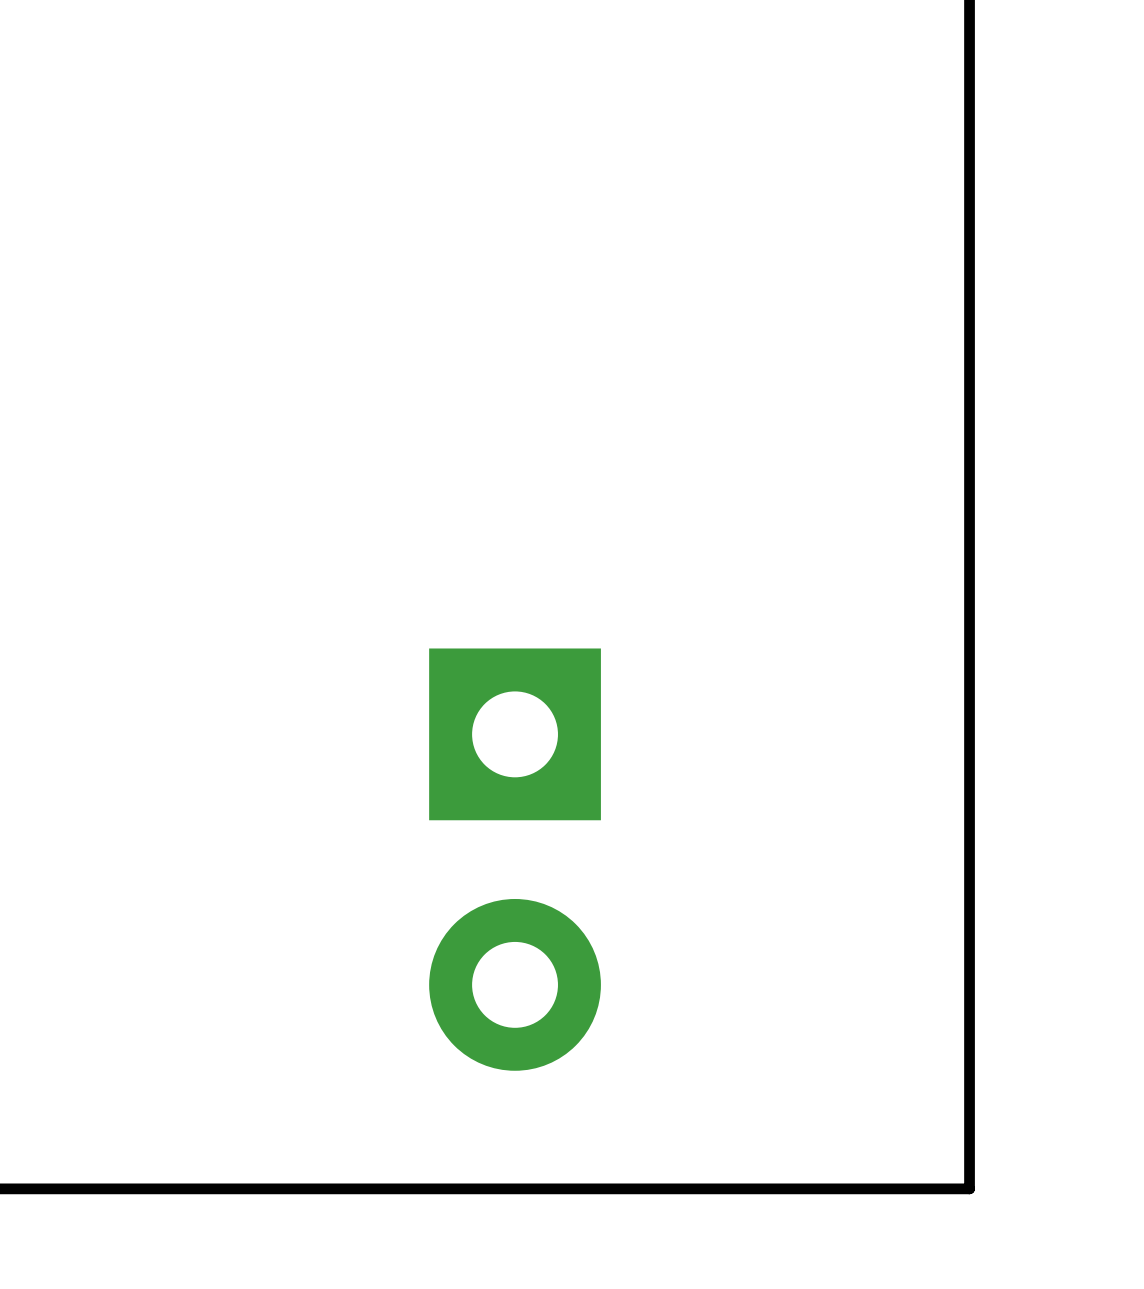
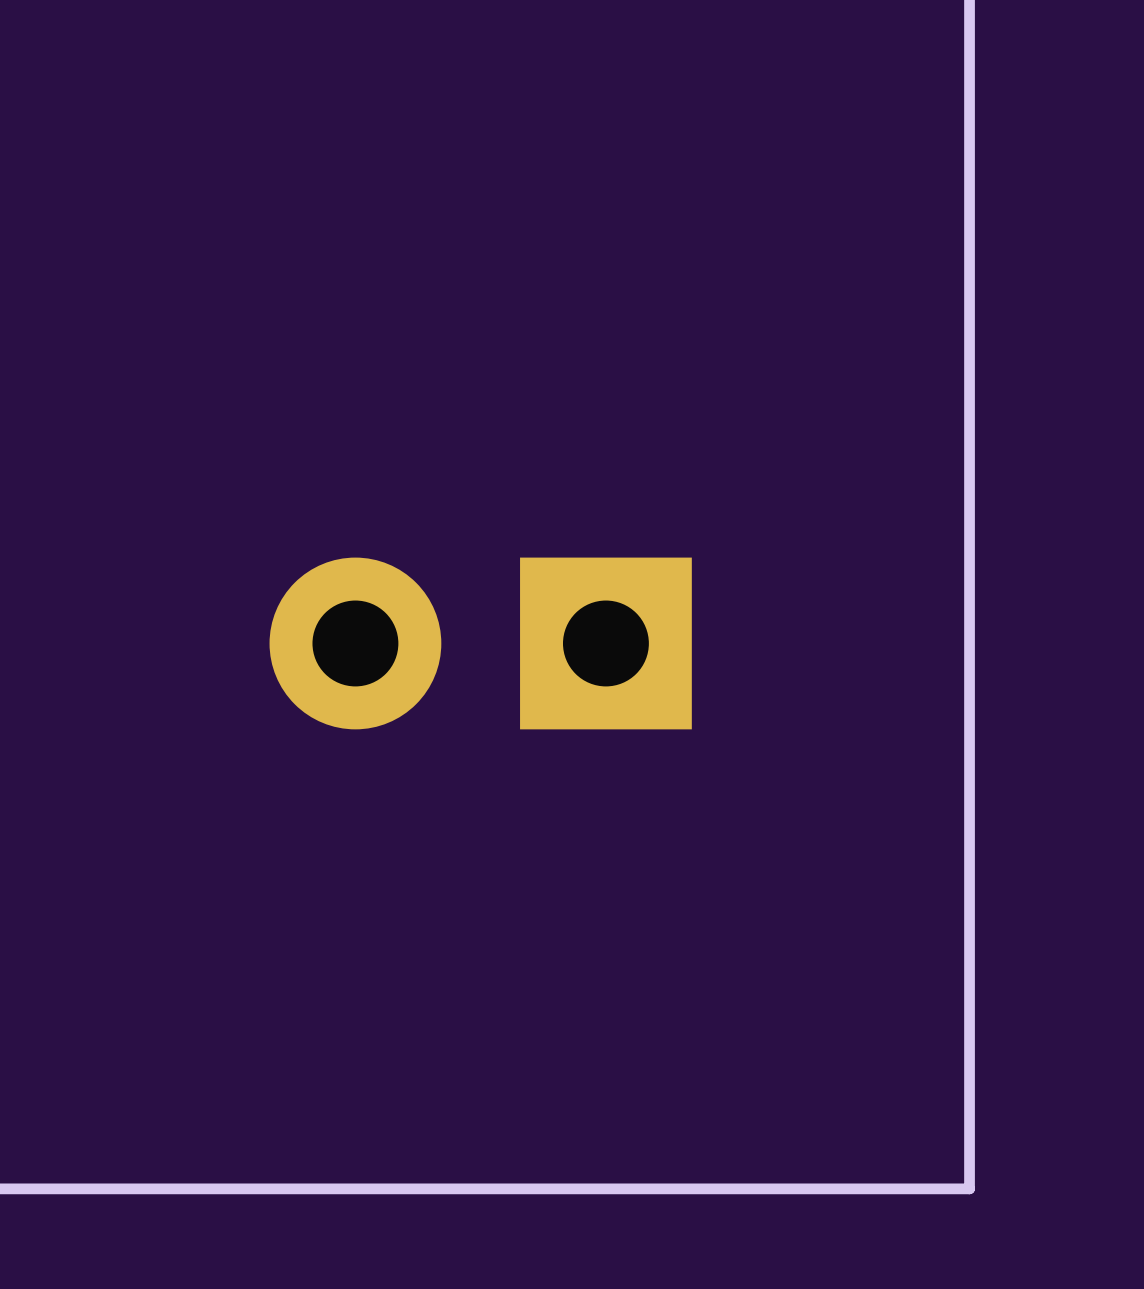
part rotation: 0° (515, 859) -> 90° clockwise (480, 643)

